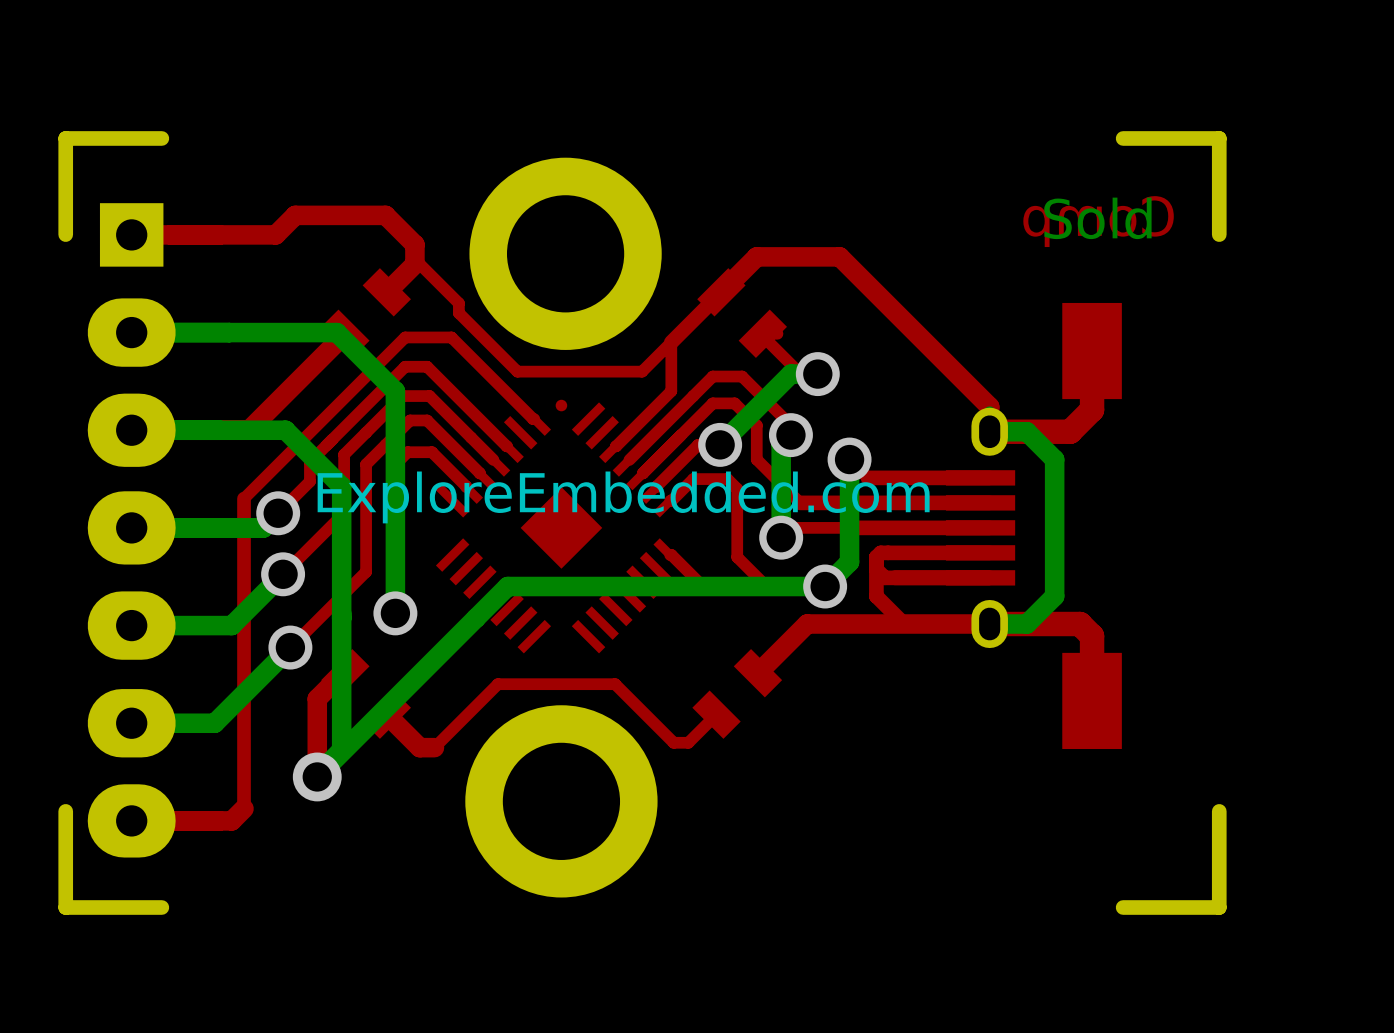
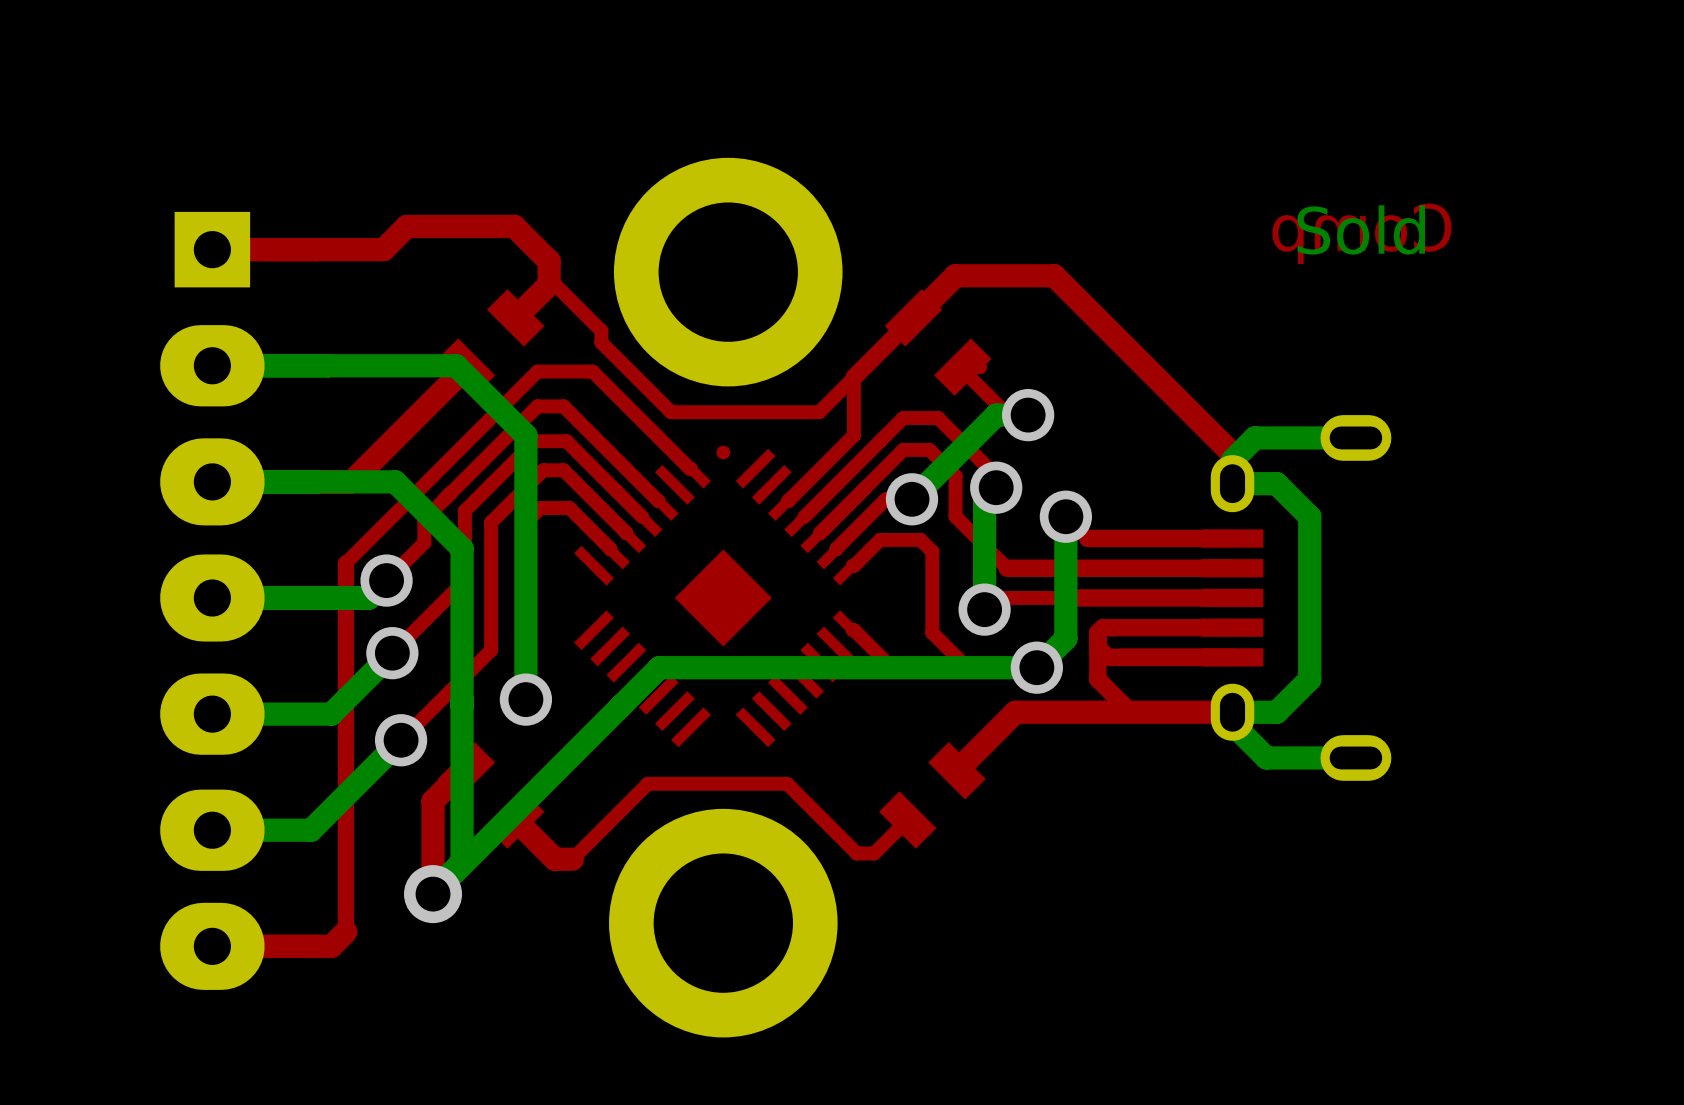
board edge: (161, 138) (65, 138) (65, 234) -> none
board edge: (1123, 138) (1219, 138) (1219, 234) -> none
part footprint: [945, 302, 1122, 750] -> [1201, 415, 1392, 781]
top track: (1092, 351) (1092, 409) (1070, 431) (989, 431) -> none
bottom track: none -> (1355, 437) (1254, 437) (1232, 460)
text: ExploreEmbedded.com (623, 497) -> none
top track: (989, 624) (1079, 624) (1092, 636) (1092, 700) -> none
bottom track: none -> (1232, 723) (1266, 757) (1355, 757)
board edge: (65, 811) (65, 907) (161, 907) -> none
board edge: (1219, 811) (1219, 907) (1123, 907) -> none

